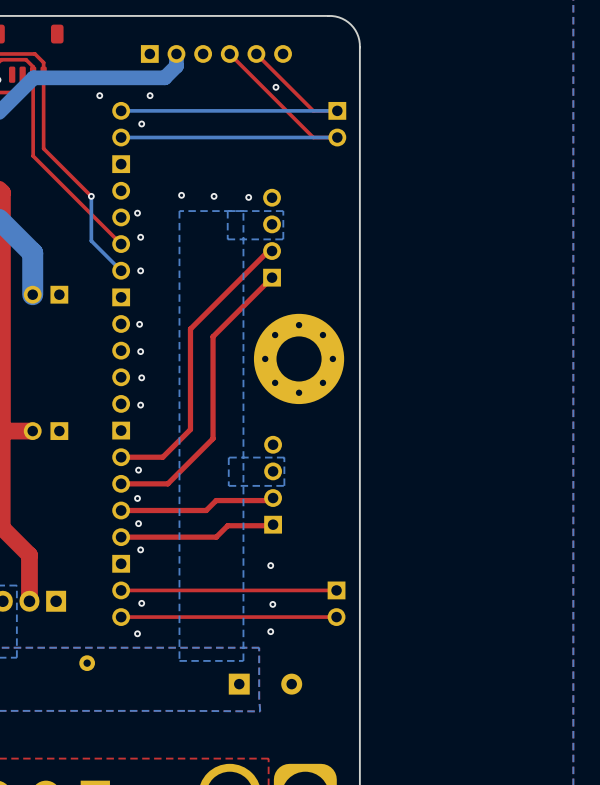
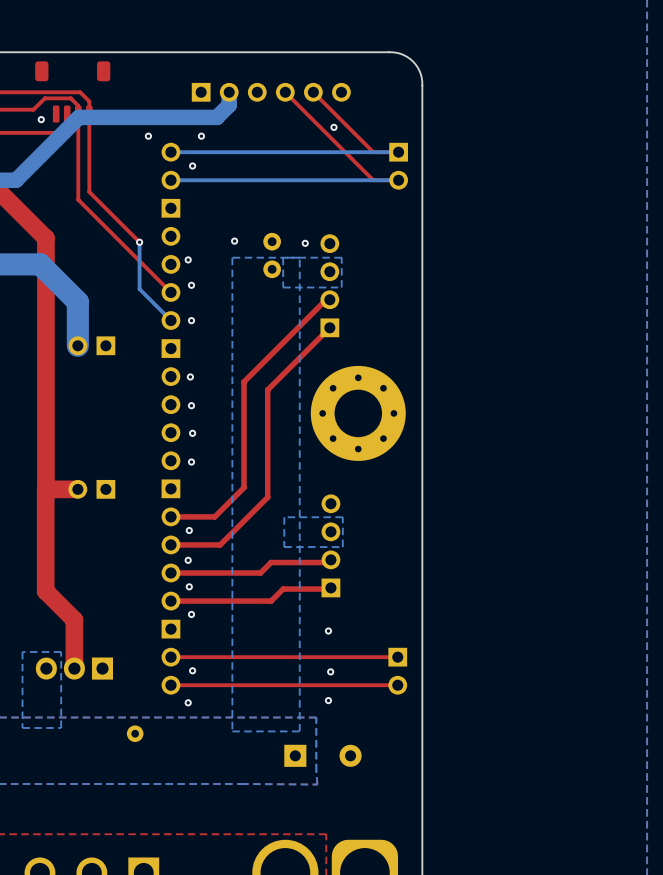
via: (214, 196) -> none
part: none -> (272, 255)

